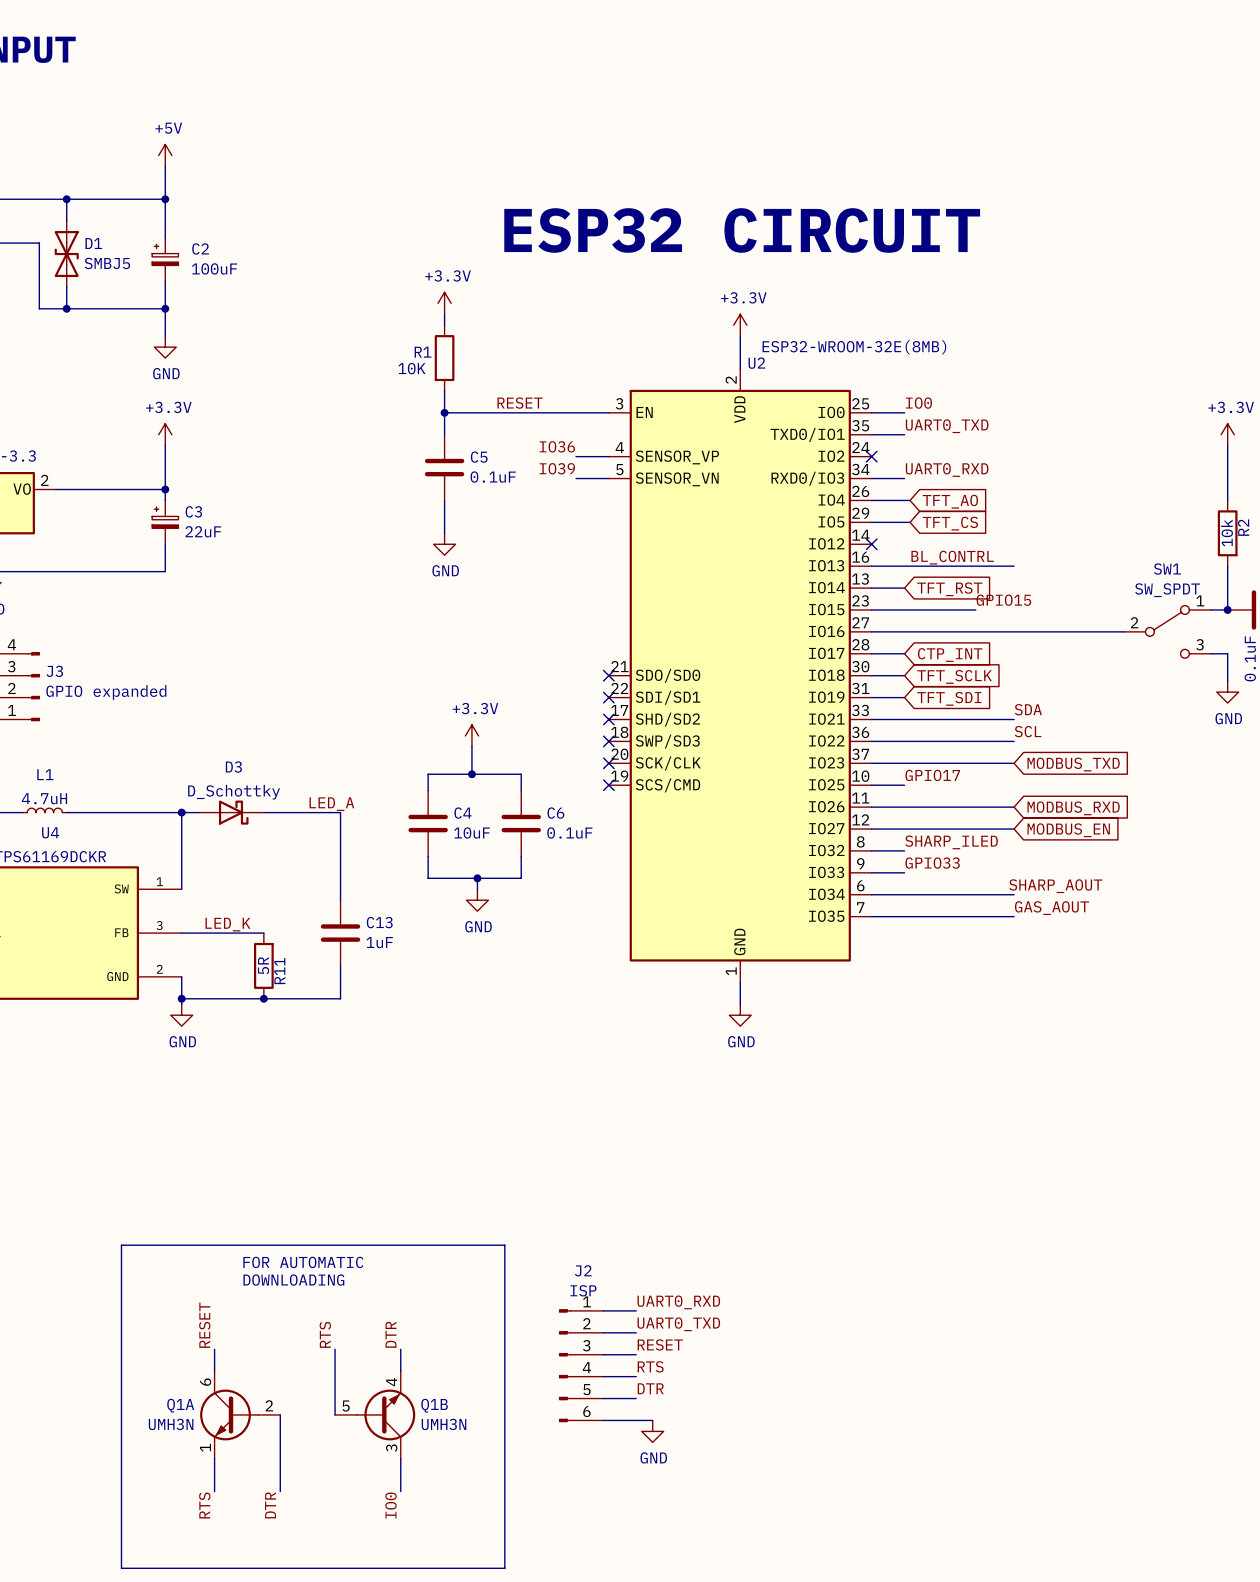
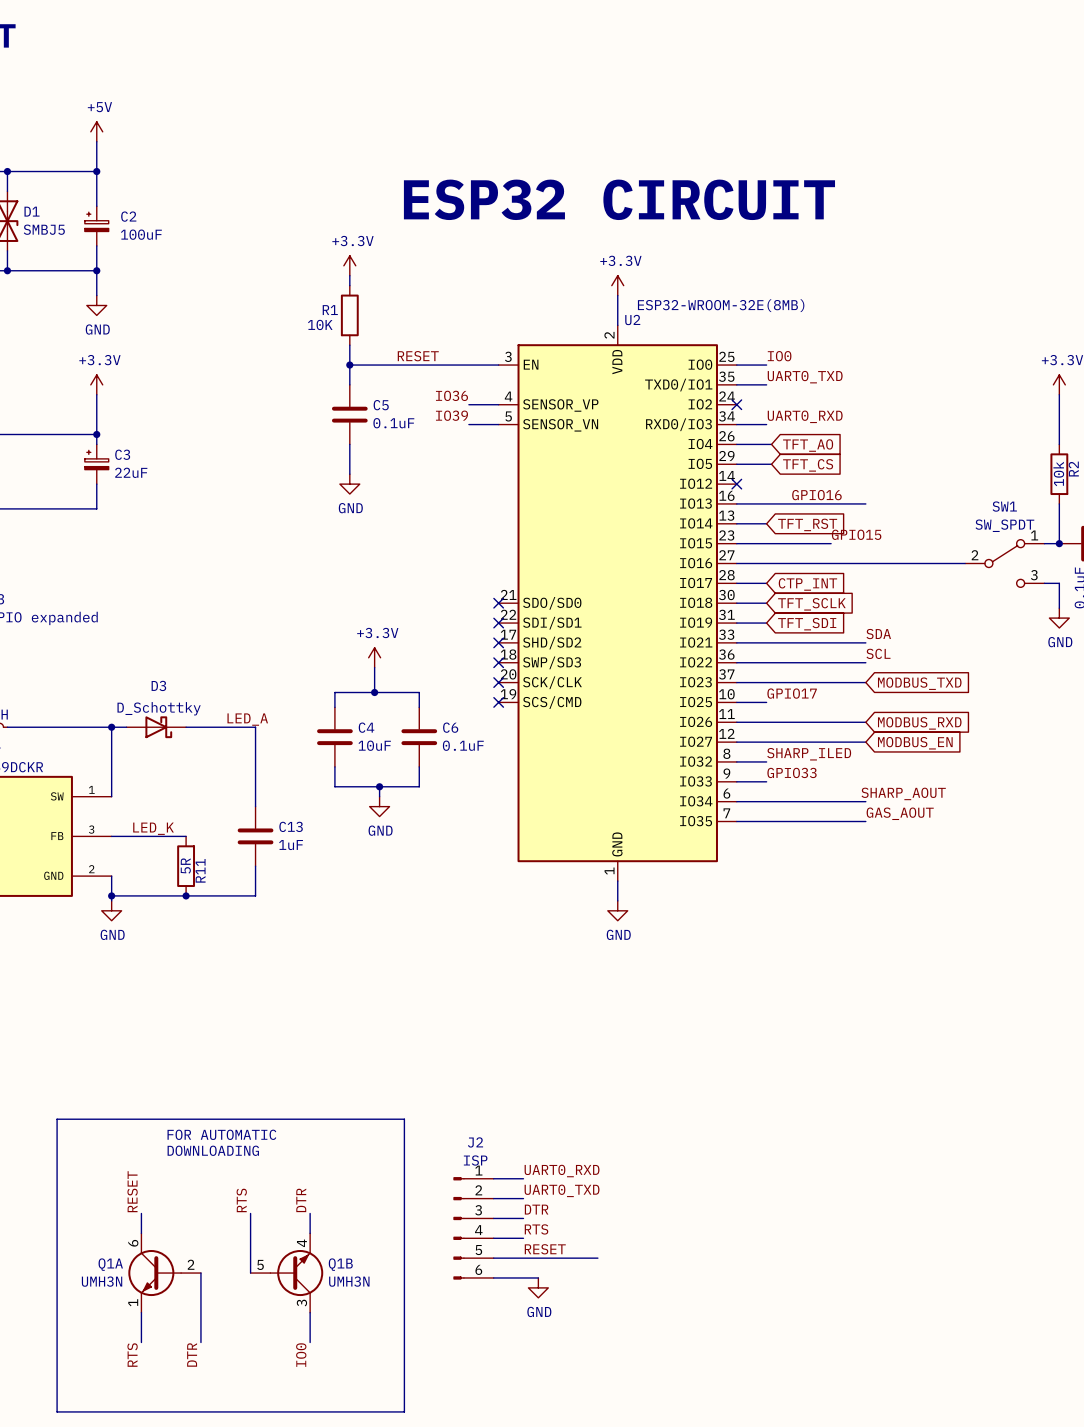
label: none -> GPIO16 (816, 495)
label: BL_CONTRL (952, 557) -> none
label: RESET (660, 1344) -> DTR (536, 1209)
label: DTR (650, 1388) -> RESET (545, 1249)
wire: none -> (523, 1258) (597, 1258)

